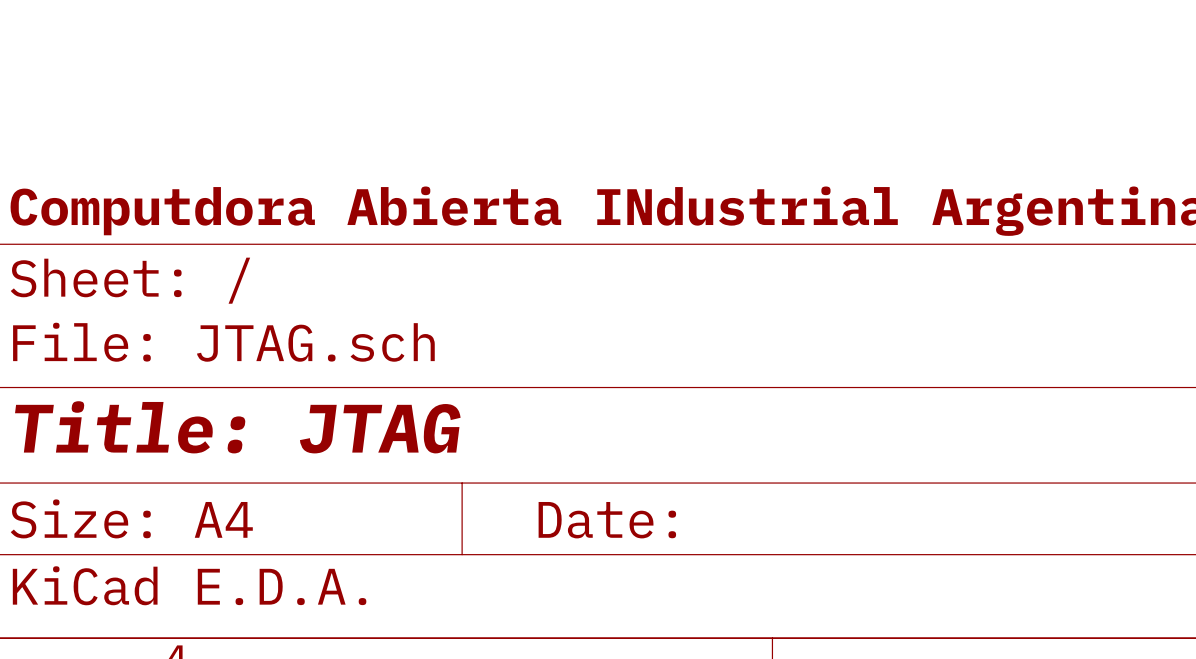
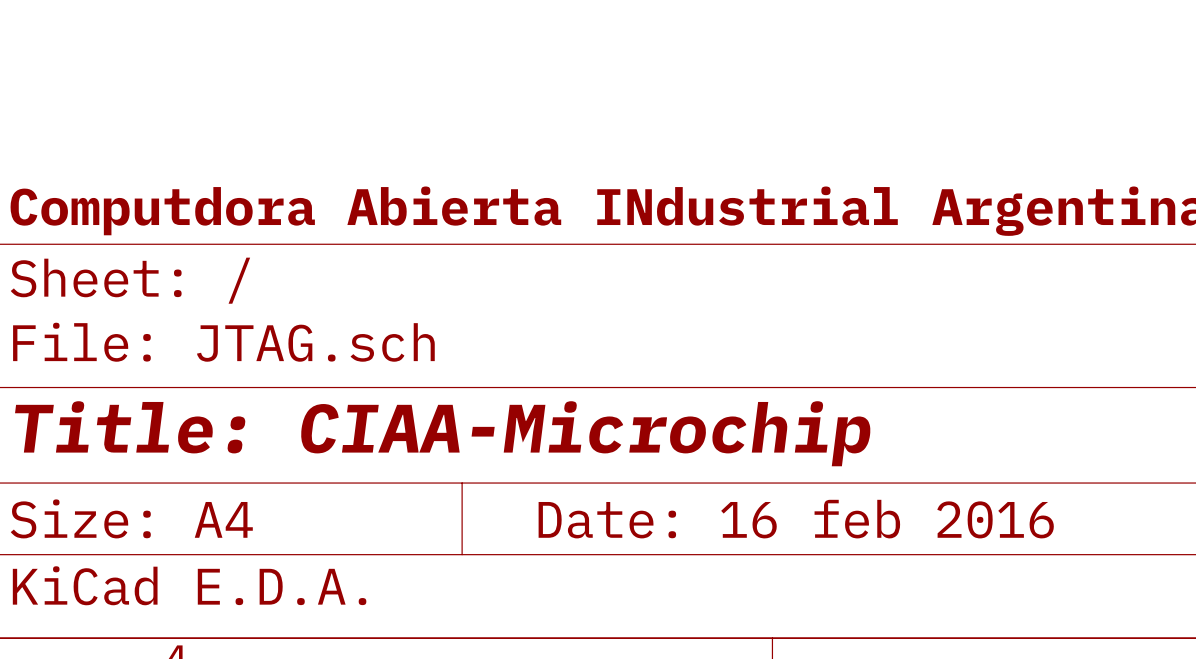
title block: Title: JTAG (237, 427) -> Title: CIAA-Microchip (442, 433)
title block: Date: (607, 520) -> Date: 16 feb 2016 (796, 519)

